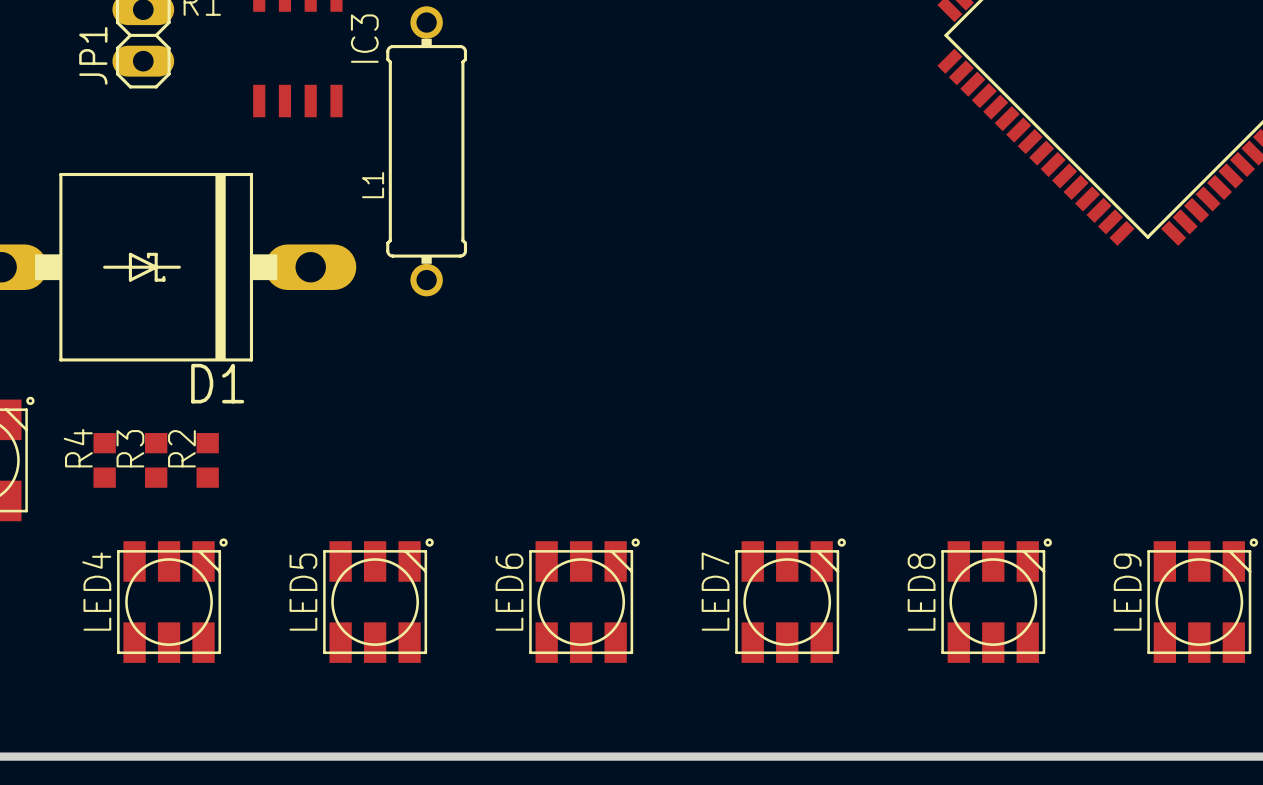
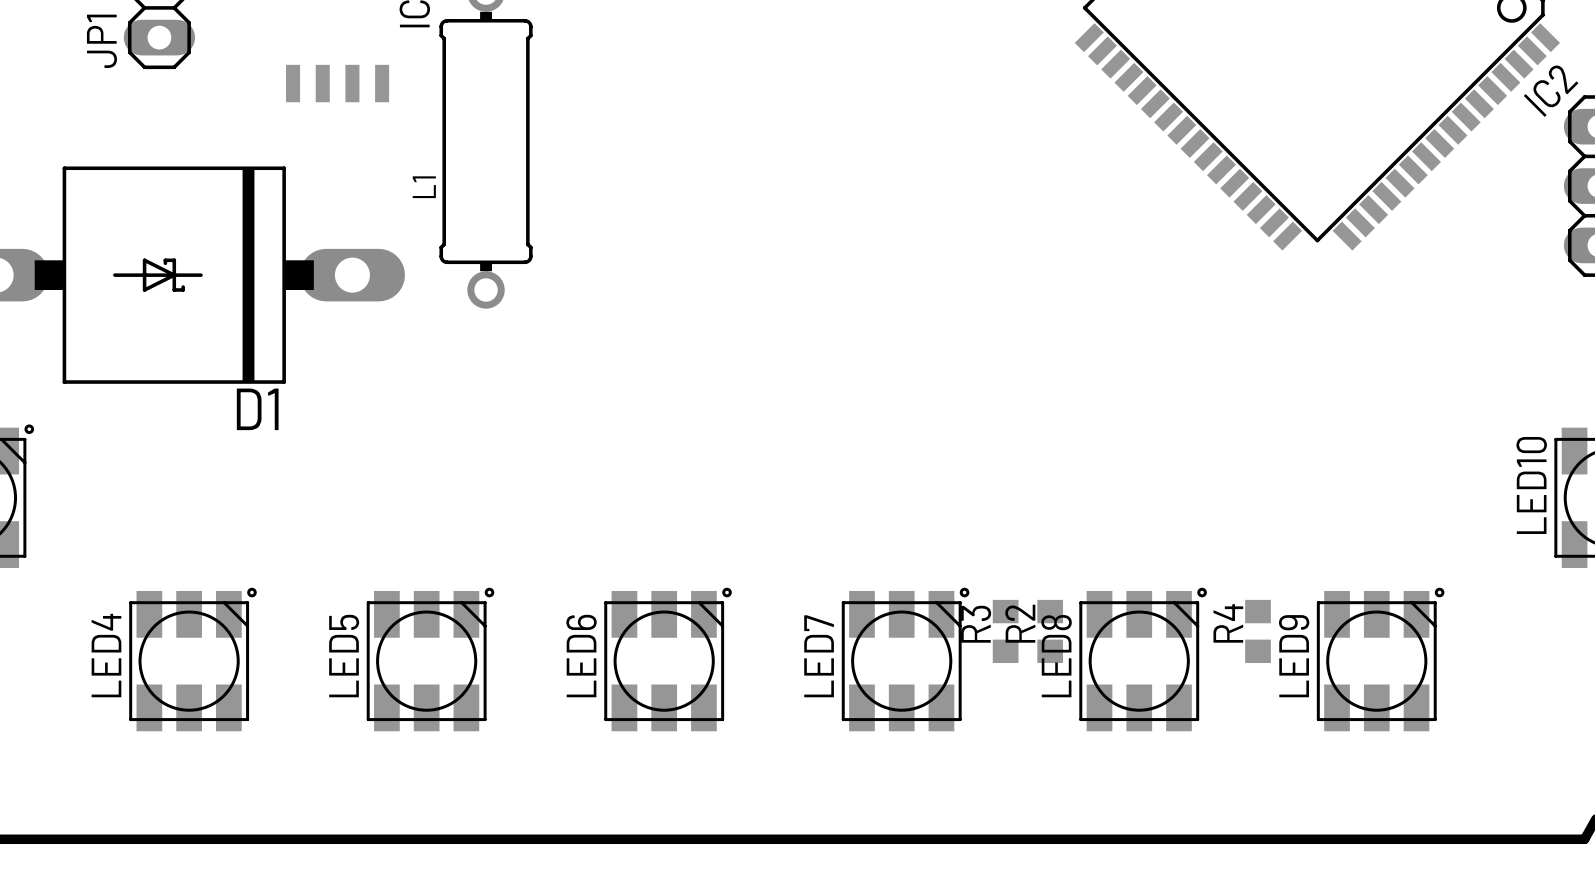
R4 position: (104, 460) -> (1258, 631)
R3 position: (156, 460) -> (1005, 631)
R2 position: (207, 460) -> (1050, 631)

